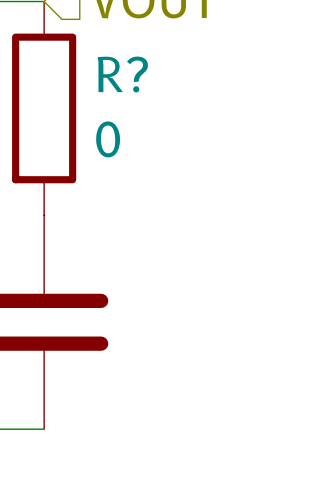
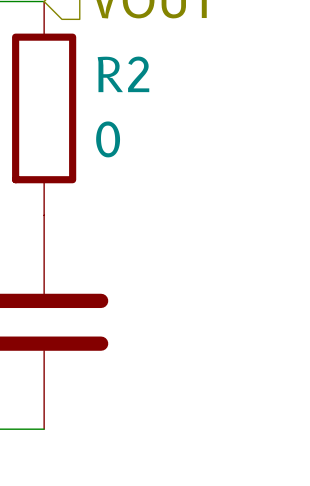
R? name: R? (122, 74) -> R2 (123, 74)

